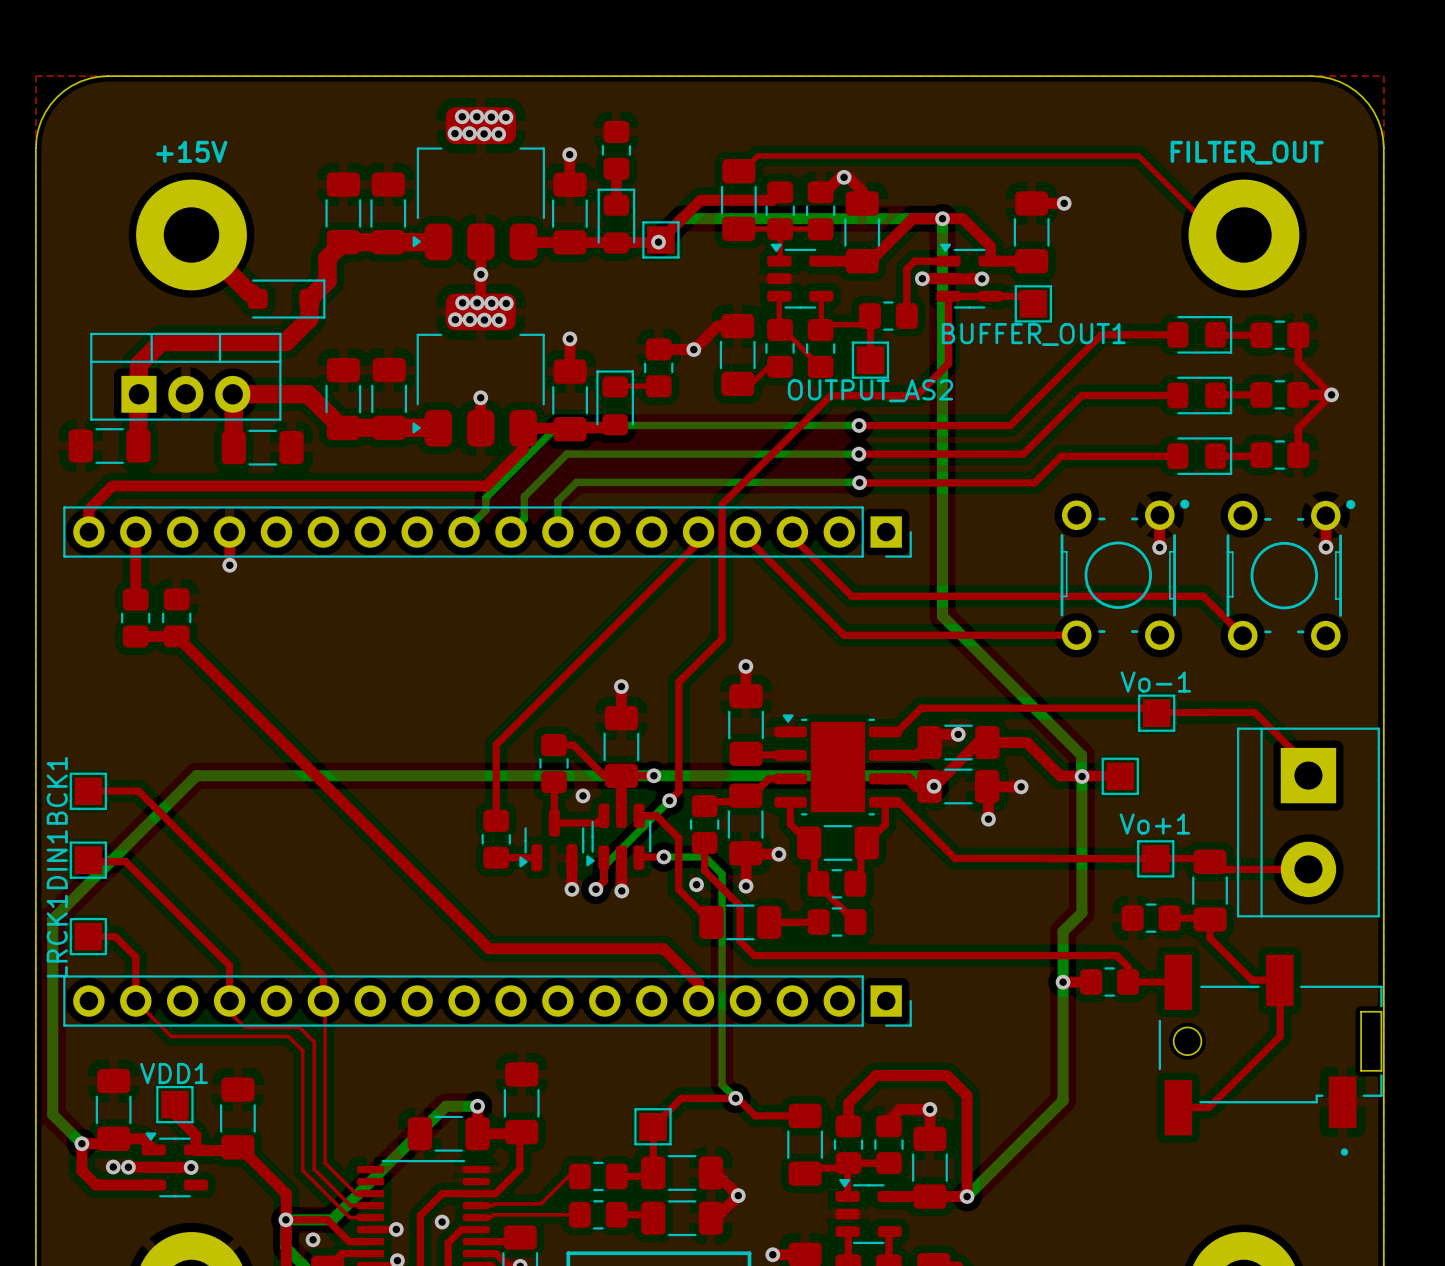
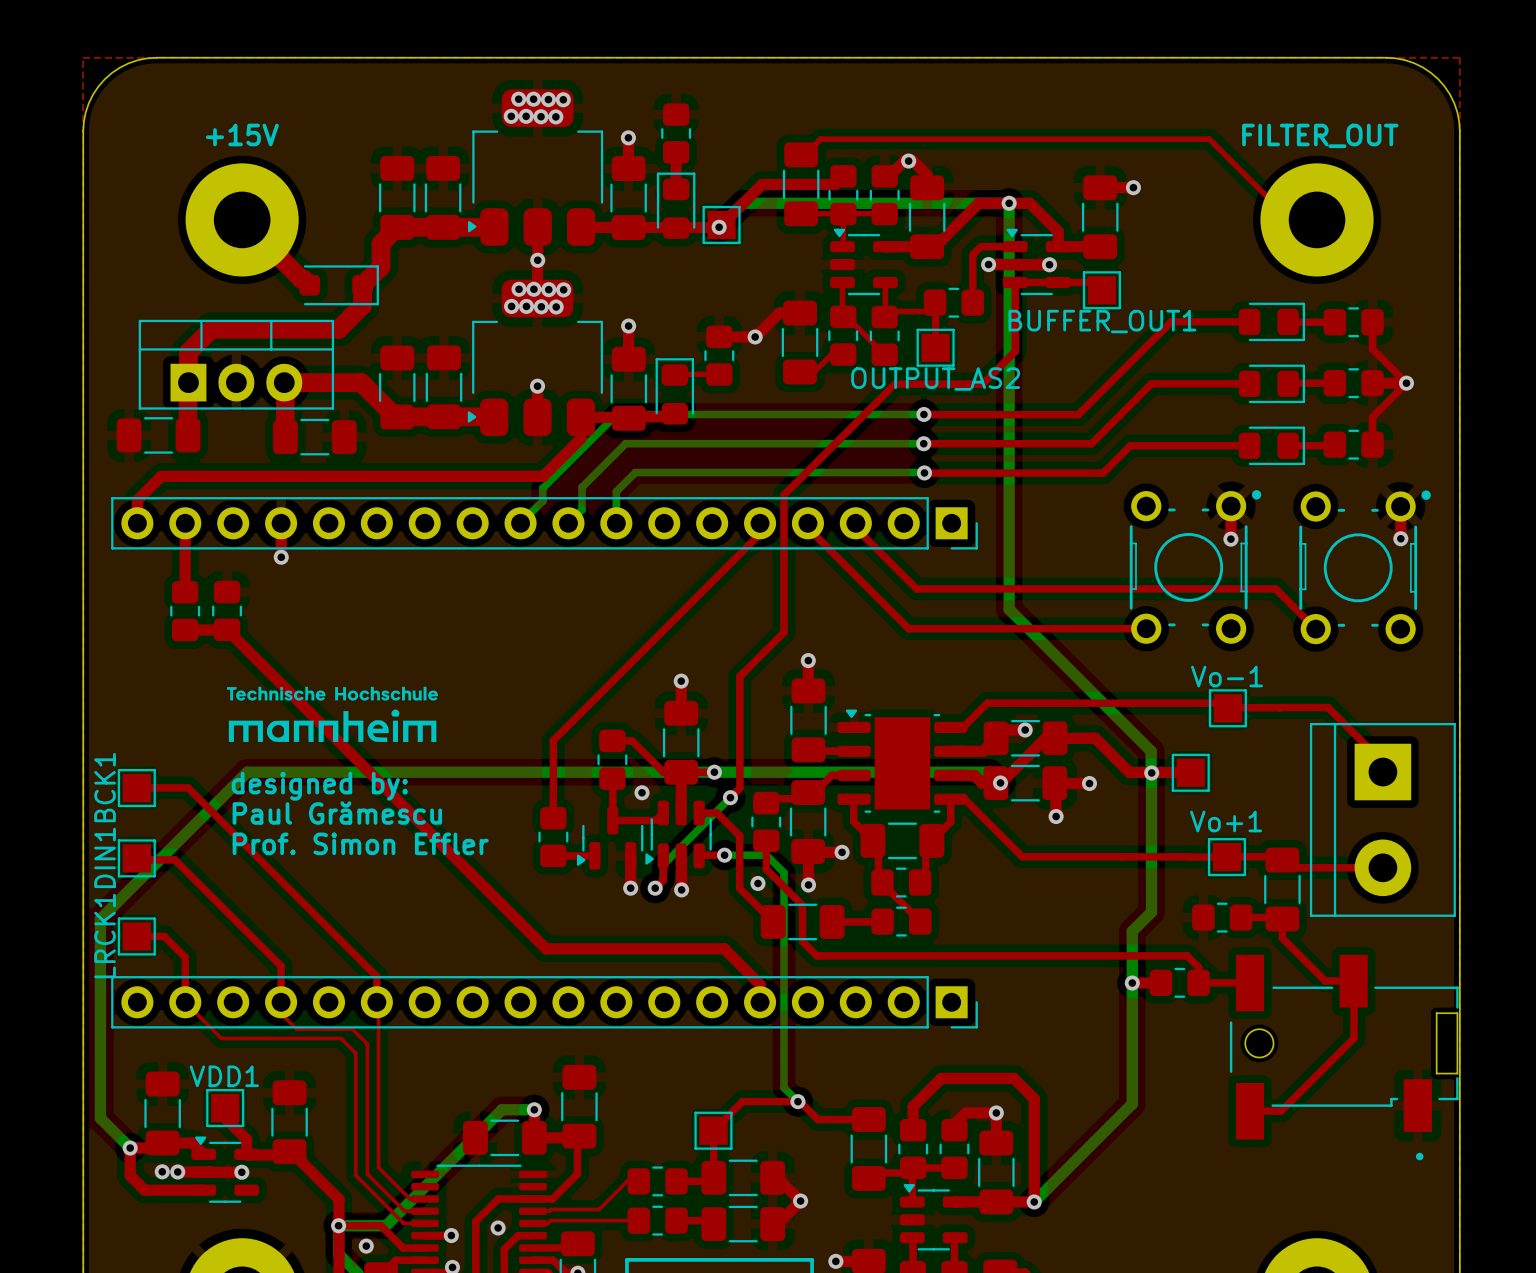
drawing: none -> [226, 686, 438, 742]
text: none -> designed by: (319, 786)
text: none -> Paul Grămescu (337, 813)
text: none -> Prof. Simon Effler (360, 843)

